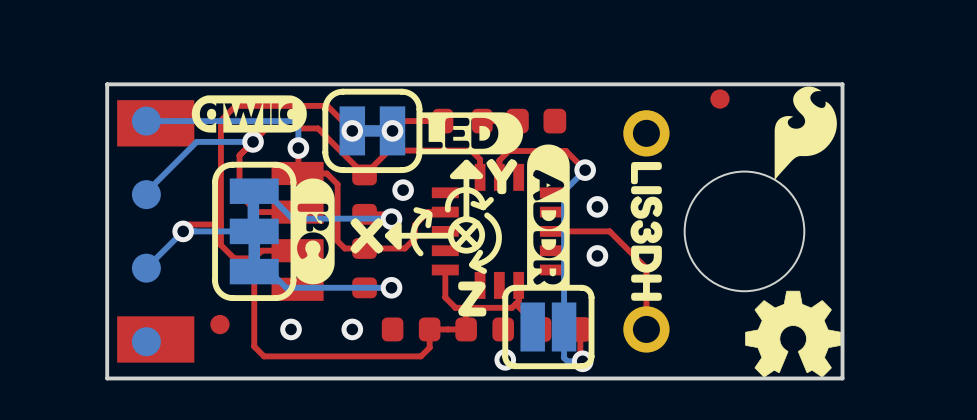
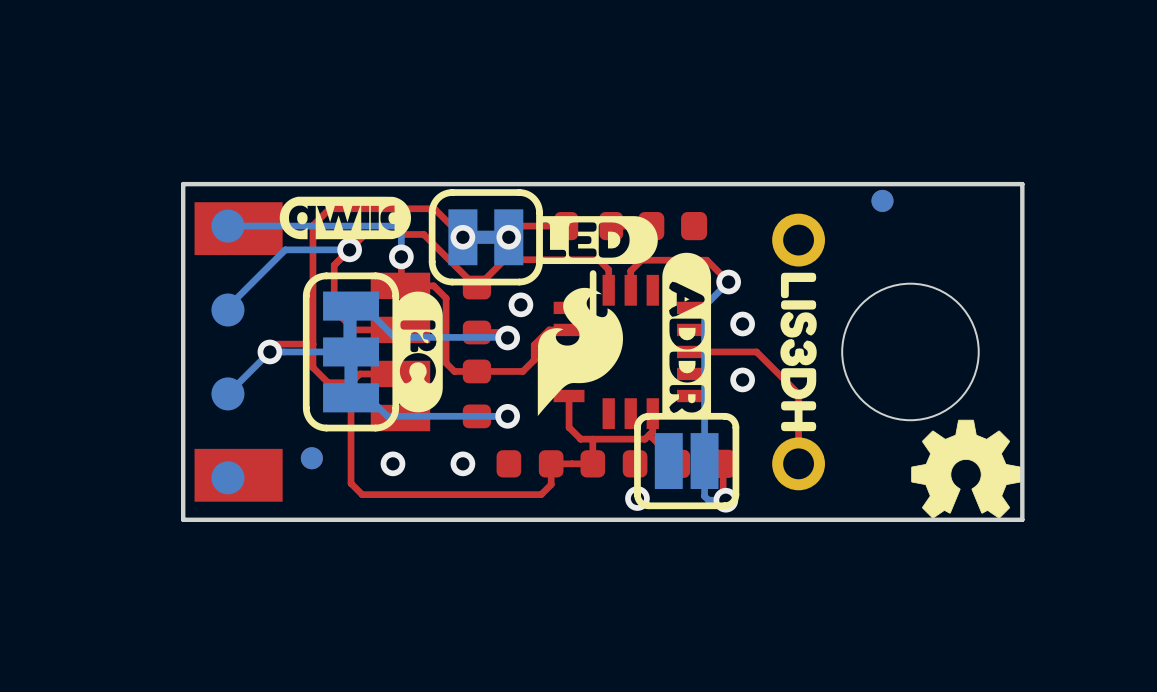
drawing: [774, 86, 837, 181] -> none
part: none -> (882, 200)
drawing: [449, 158, 518, 195] -> none
line: (491, 199) (483, 207) -> none
line: (473, 203) (483, 207) -> none
line: (483, 207) (481, 200) (476, 193) (464, 189) (456, 192) (451, 197) (447, 209) -> none
line: (416, 210) (428, 213) -> none
line: (428, 213) (418, 220) (413, 231) (414, 243) (420, 253) -> none
line: (429, 214) (428, 225) -> none
line: (487, 215) (497, 228) (498, 242) (495, 251) (488, 259) (472, 264) (480, 252) -> none
drawing shape: [447, 216, 486, 254] -> [537, 287, 623, 417]
drawing: [350, 217, 402, 254] -> none
line: (477, 223) (457, 244) -> none
line: (455, 225) (475, 244) -> none
line: (449, 235) (387, 235) -> none
line: (472, 265) (484, 271) -> none
drawing: [458, 281, 487, 317] -> none
part: none -> (311, 458)

